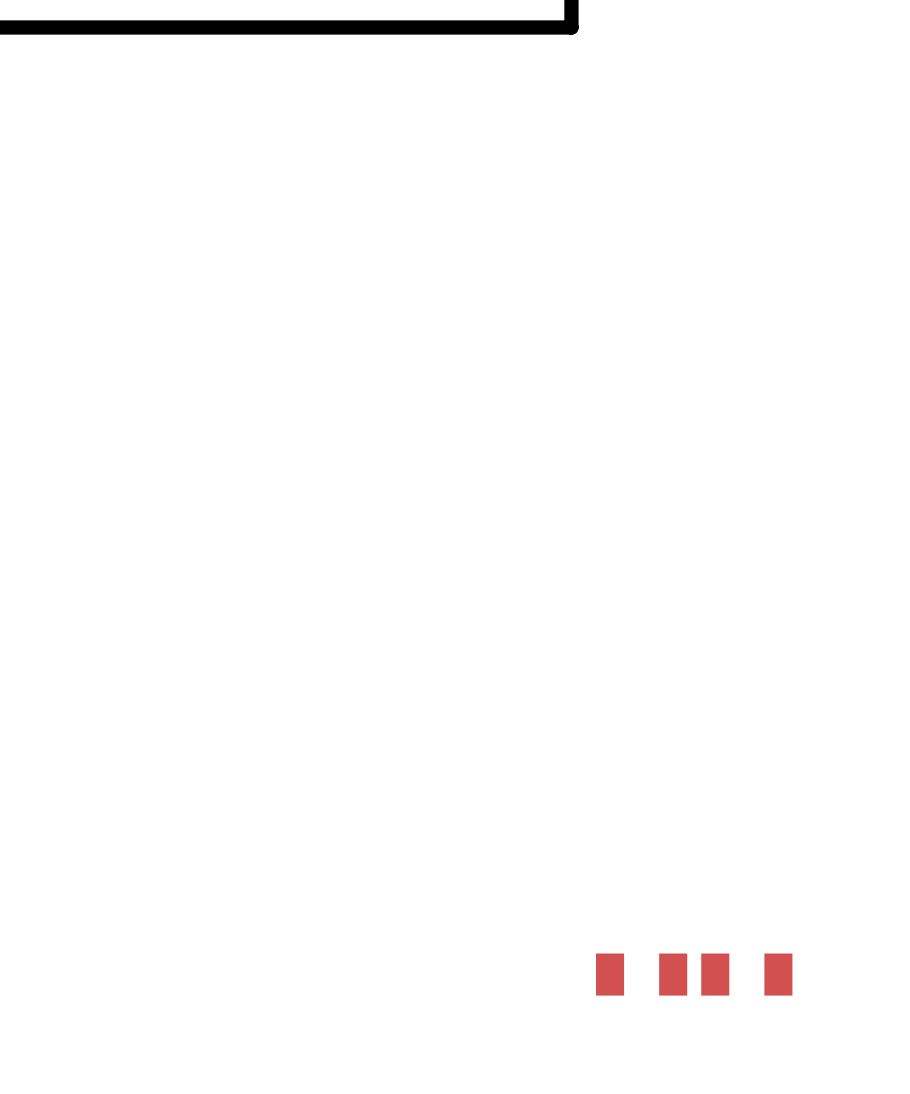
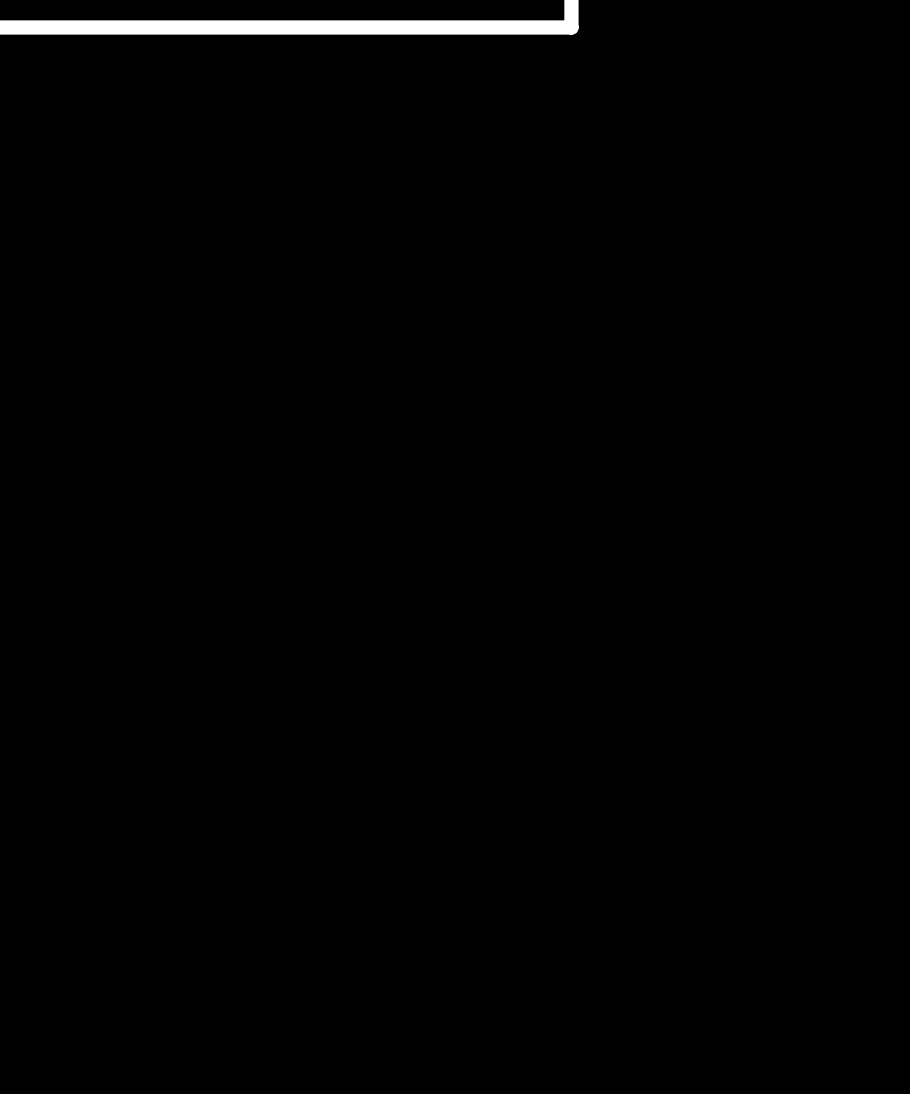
part: (641, 974) -> none
part: (746, 974) -> none

